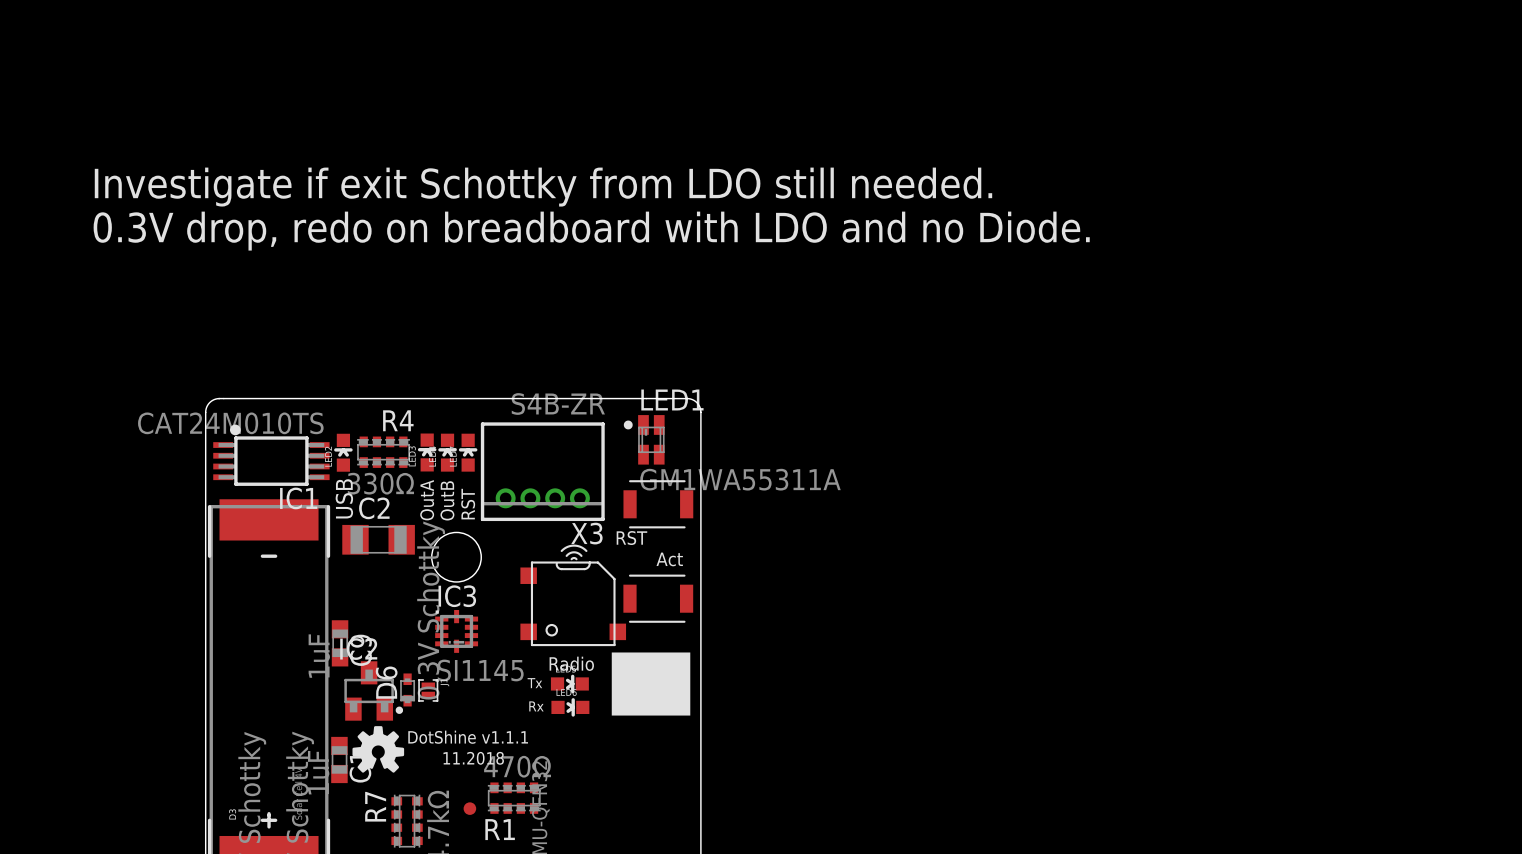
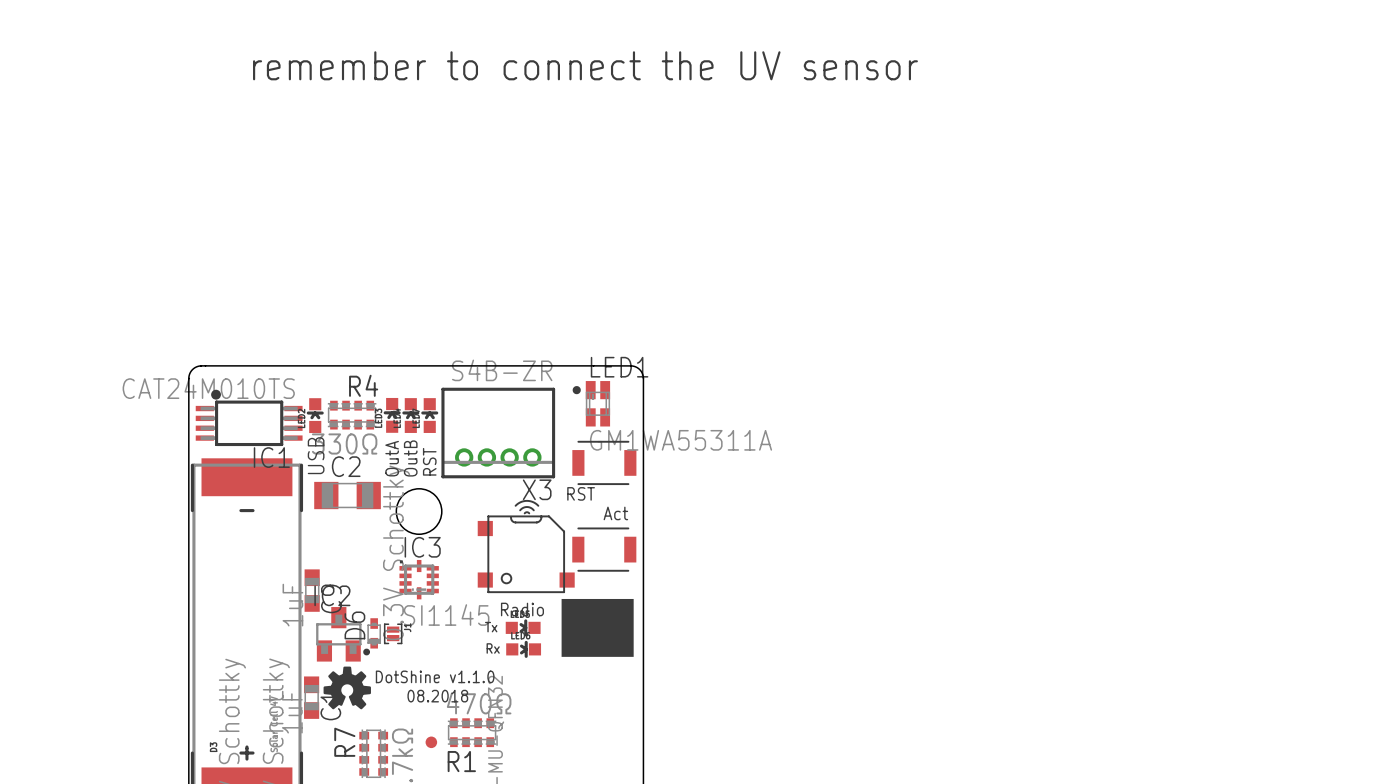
text: none -> remember to connect the UV sensor (585, 65)
text: Investigate if exit Schottky from LDO still needed. (543, 187) -> none
text: 0.3V drop, redo on breadboard with LDO and no Diode. (591, 231) -> none
text: DotShine v1.1.1 (468, 737) -> DotShine v1.1.0 (435, 676)
text: 11.2018 (473, 758) -> 08.2018 (437, 696)

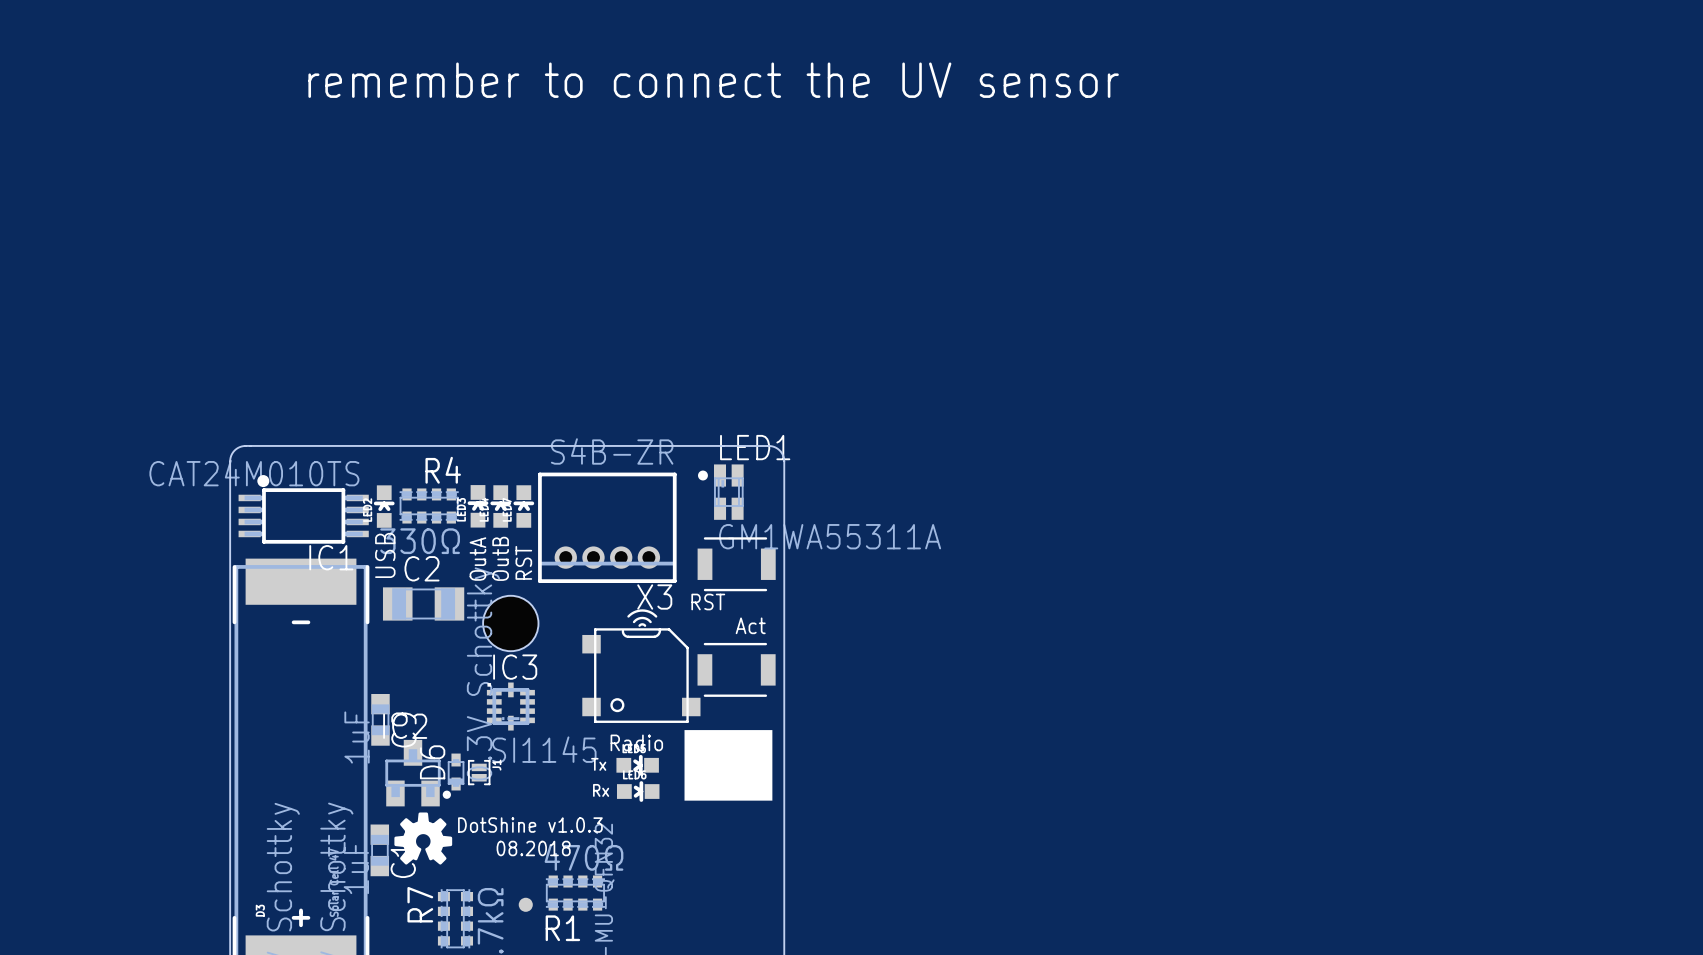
text: DotShine v1.1.0 (435, 676) -> DotShine v1.0.3 (530, 825)

